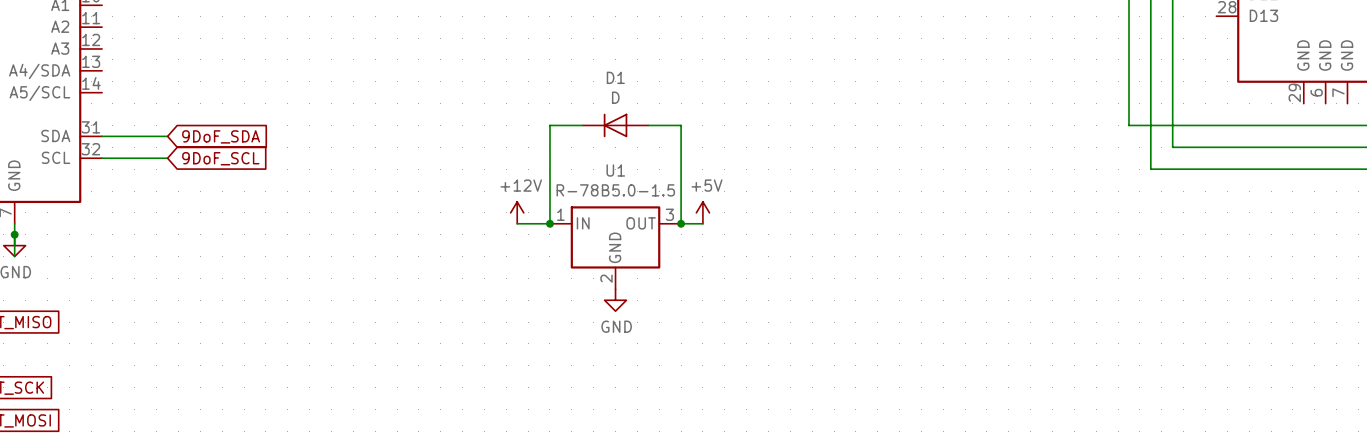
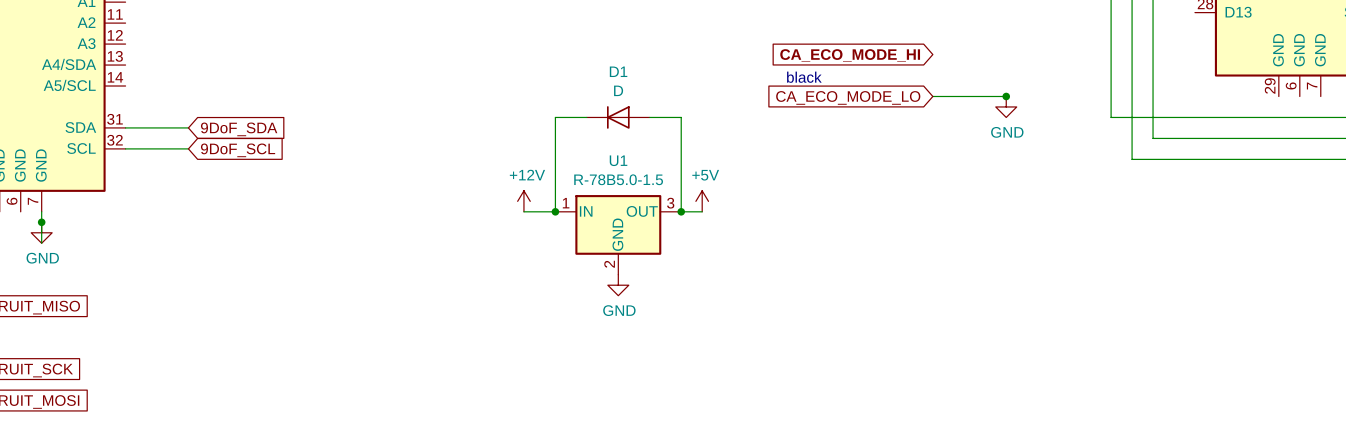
global label: none -> CA_ECO_MODE_HI (850, 55)
text: none -> black (804, 77)
wire: none -> (932, 96) (1006, 96)
junction: none -> (1006, 96)
global label: none -> CA_ECO_MODE_LO (848, 97)
power symbol: none -> GND (1006, 106)

